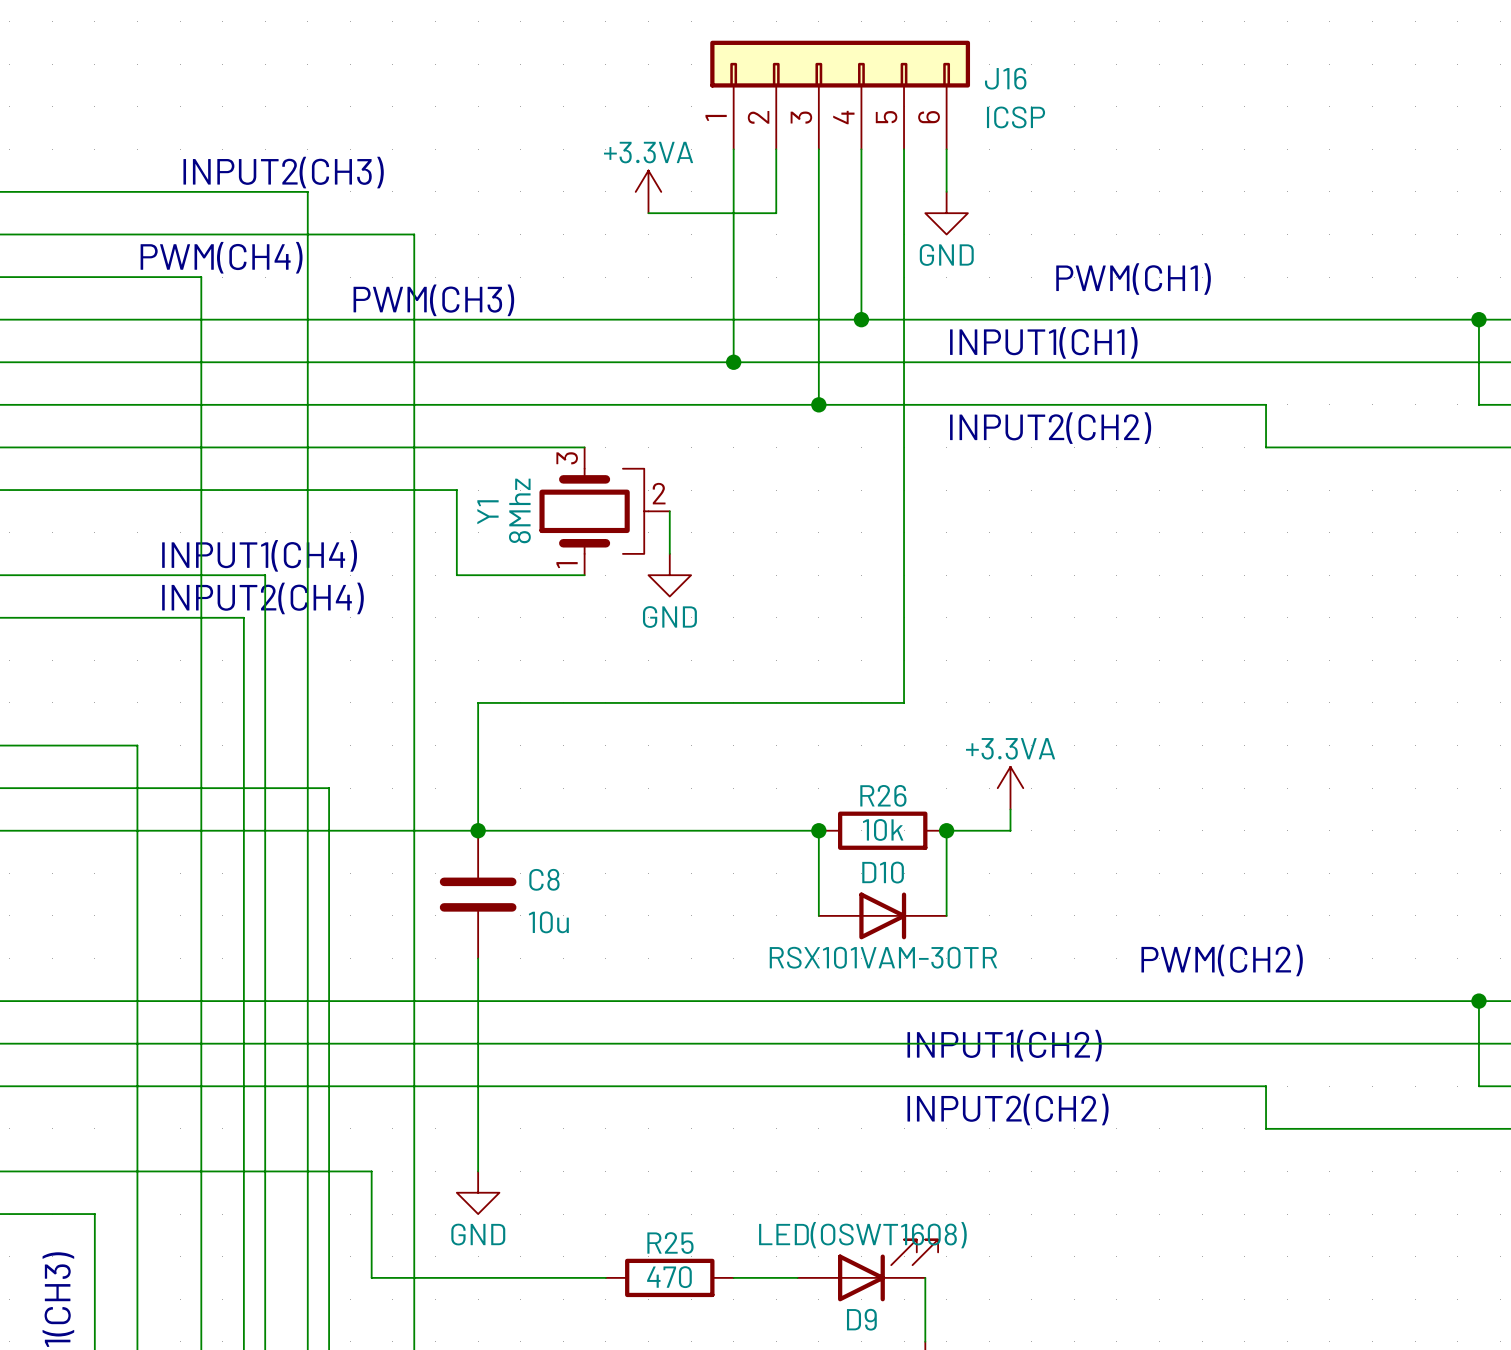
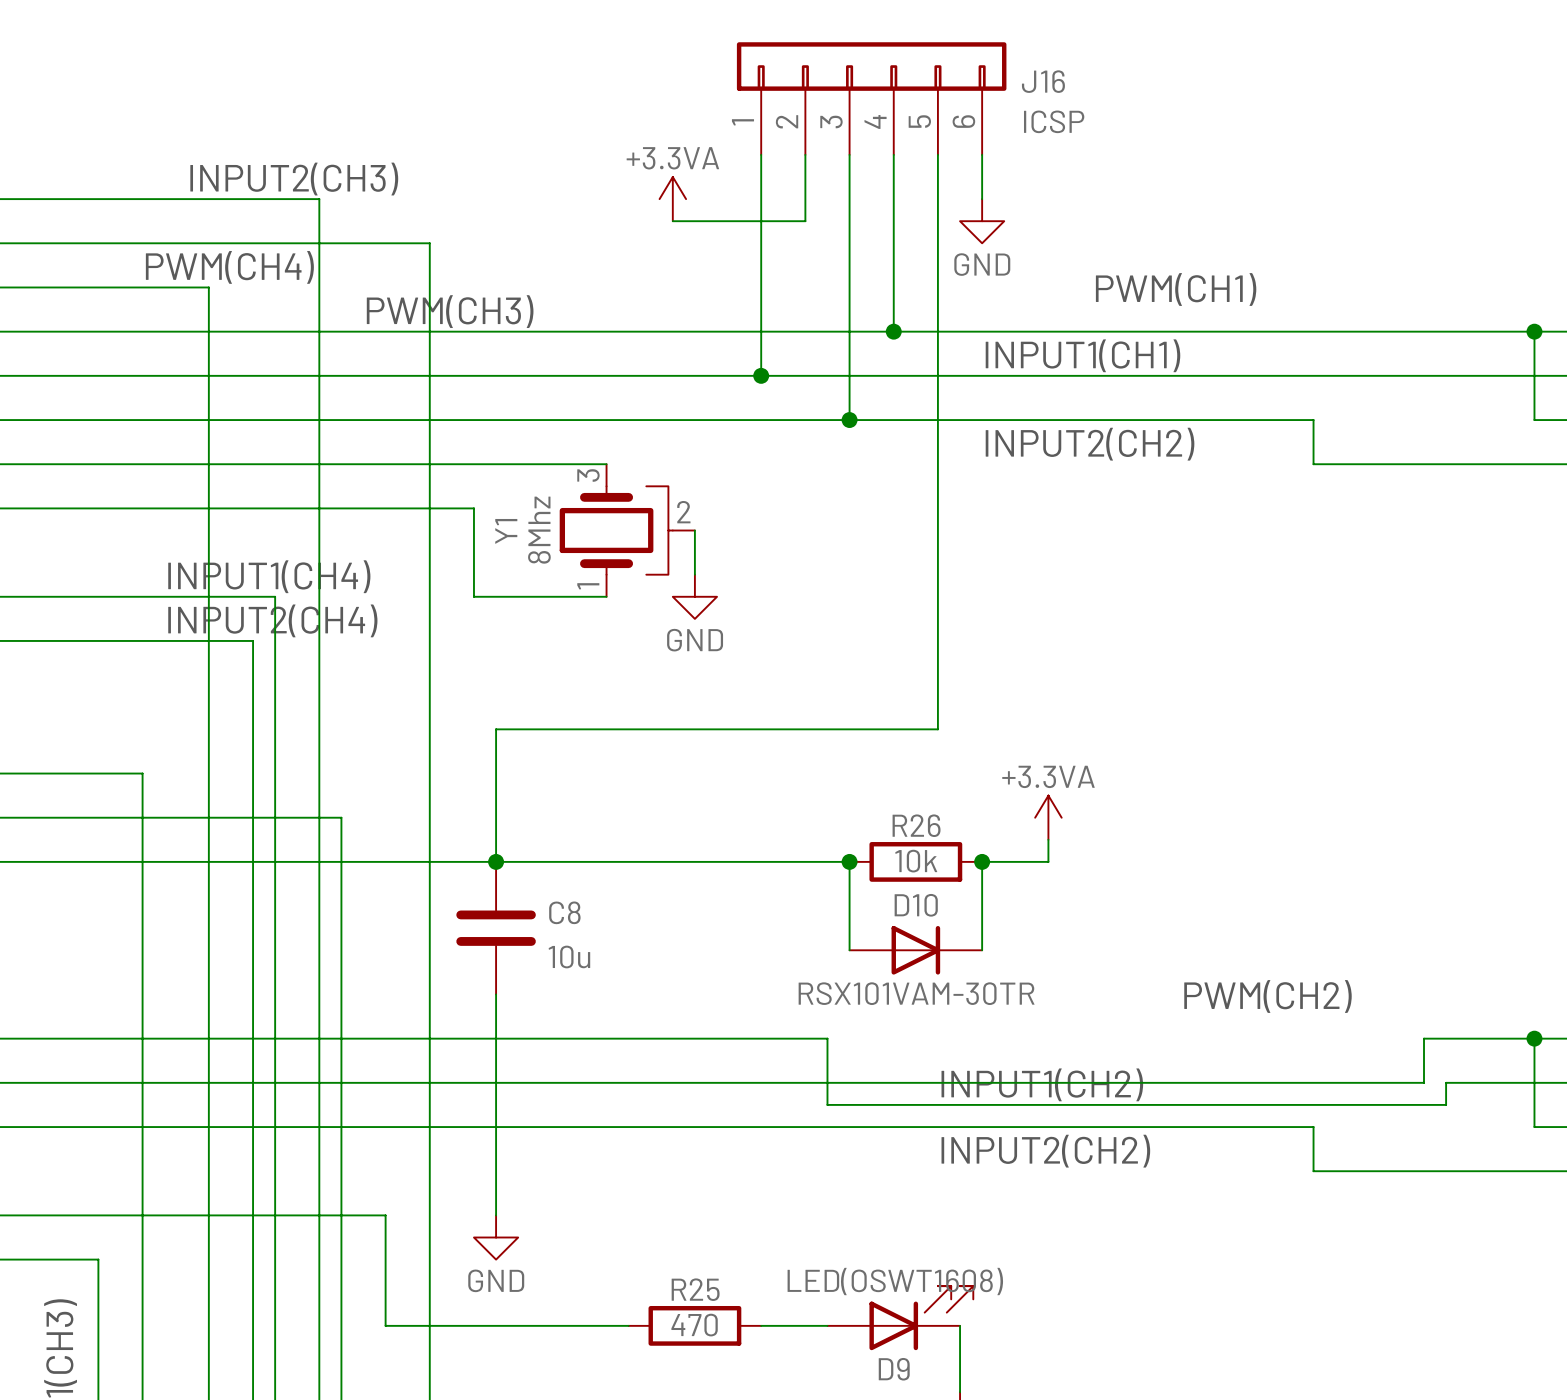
wire: (797, 1001) (1372, 1001) -> (827, 1038) (827, 1104) (1446, 1104) (1446, 1082)
wire: (1372, 1043) (1393, 1043) -> (1424, 1082) (1424, 1038)

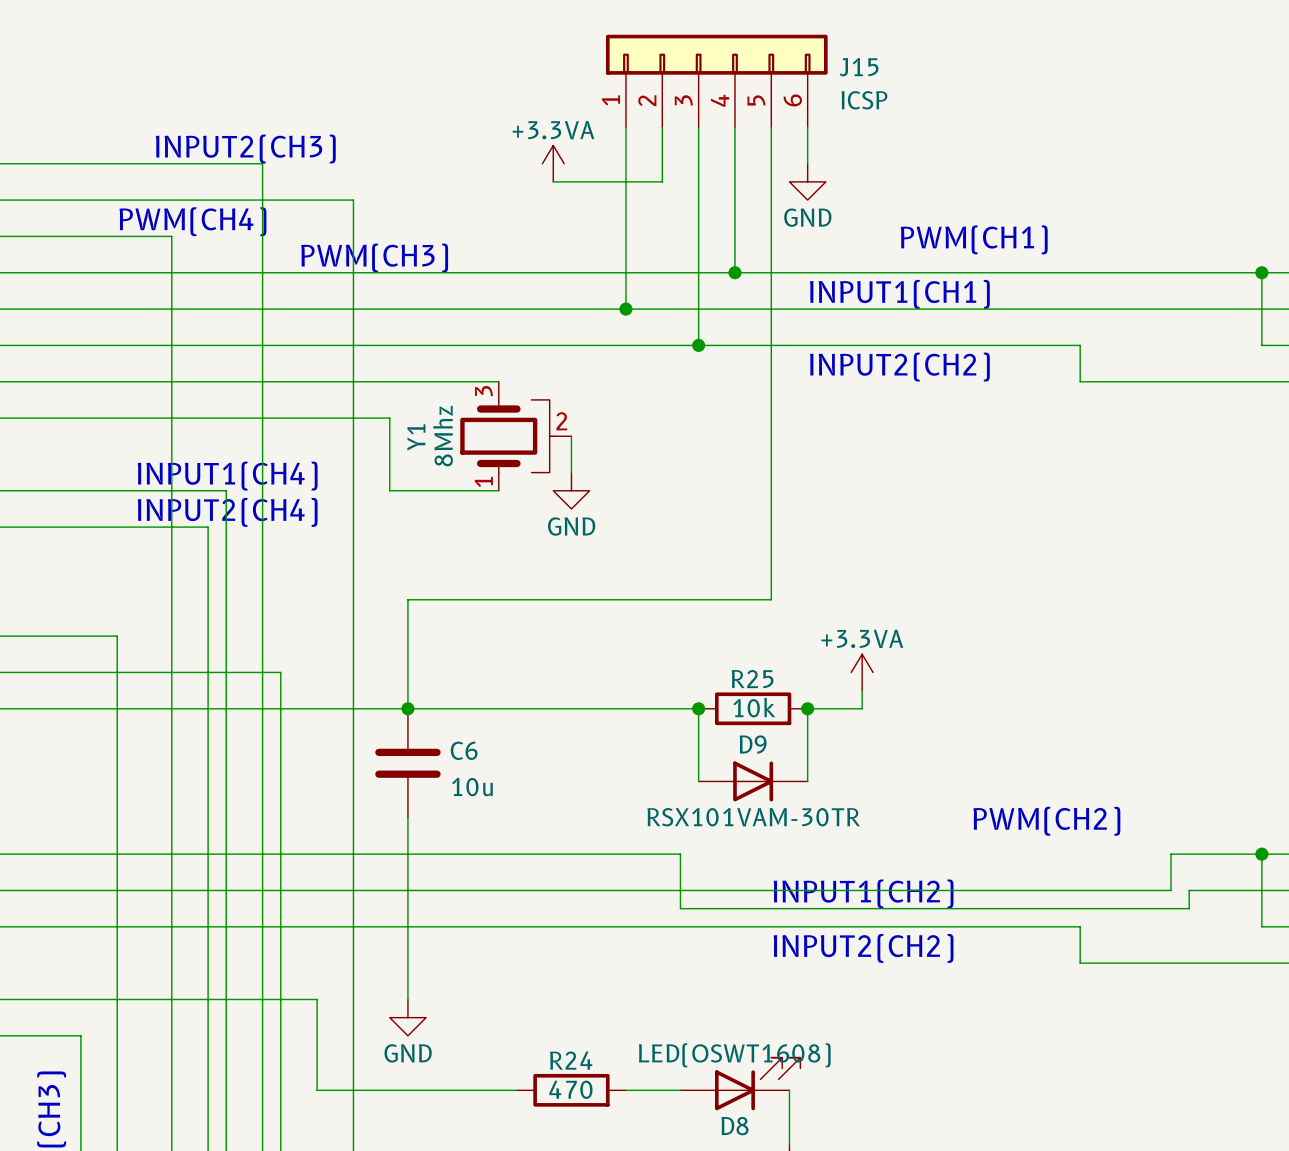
J16 name: J16 (1043, 81) -> J15 (859, 67)
R26 name: R26 (916, 825) -> R25 (752, 679)
D10 name: D10 (916, 905) -> D9 (753, 744)
C8 name: C8 (564, 912) -> C6 (464, 750)
R25 name: R25 (695, 1289) -> R24 (571, 1060)
D9 name: D9 (894, 1369) -> D8 (734, 1126)

